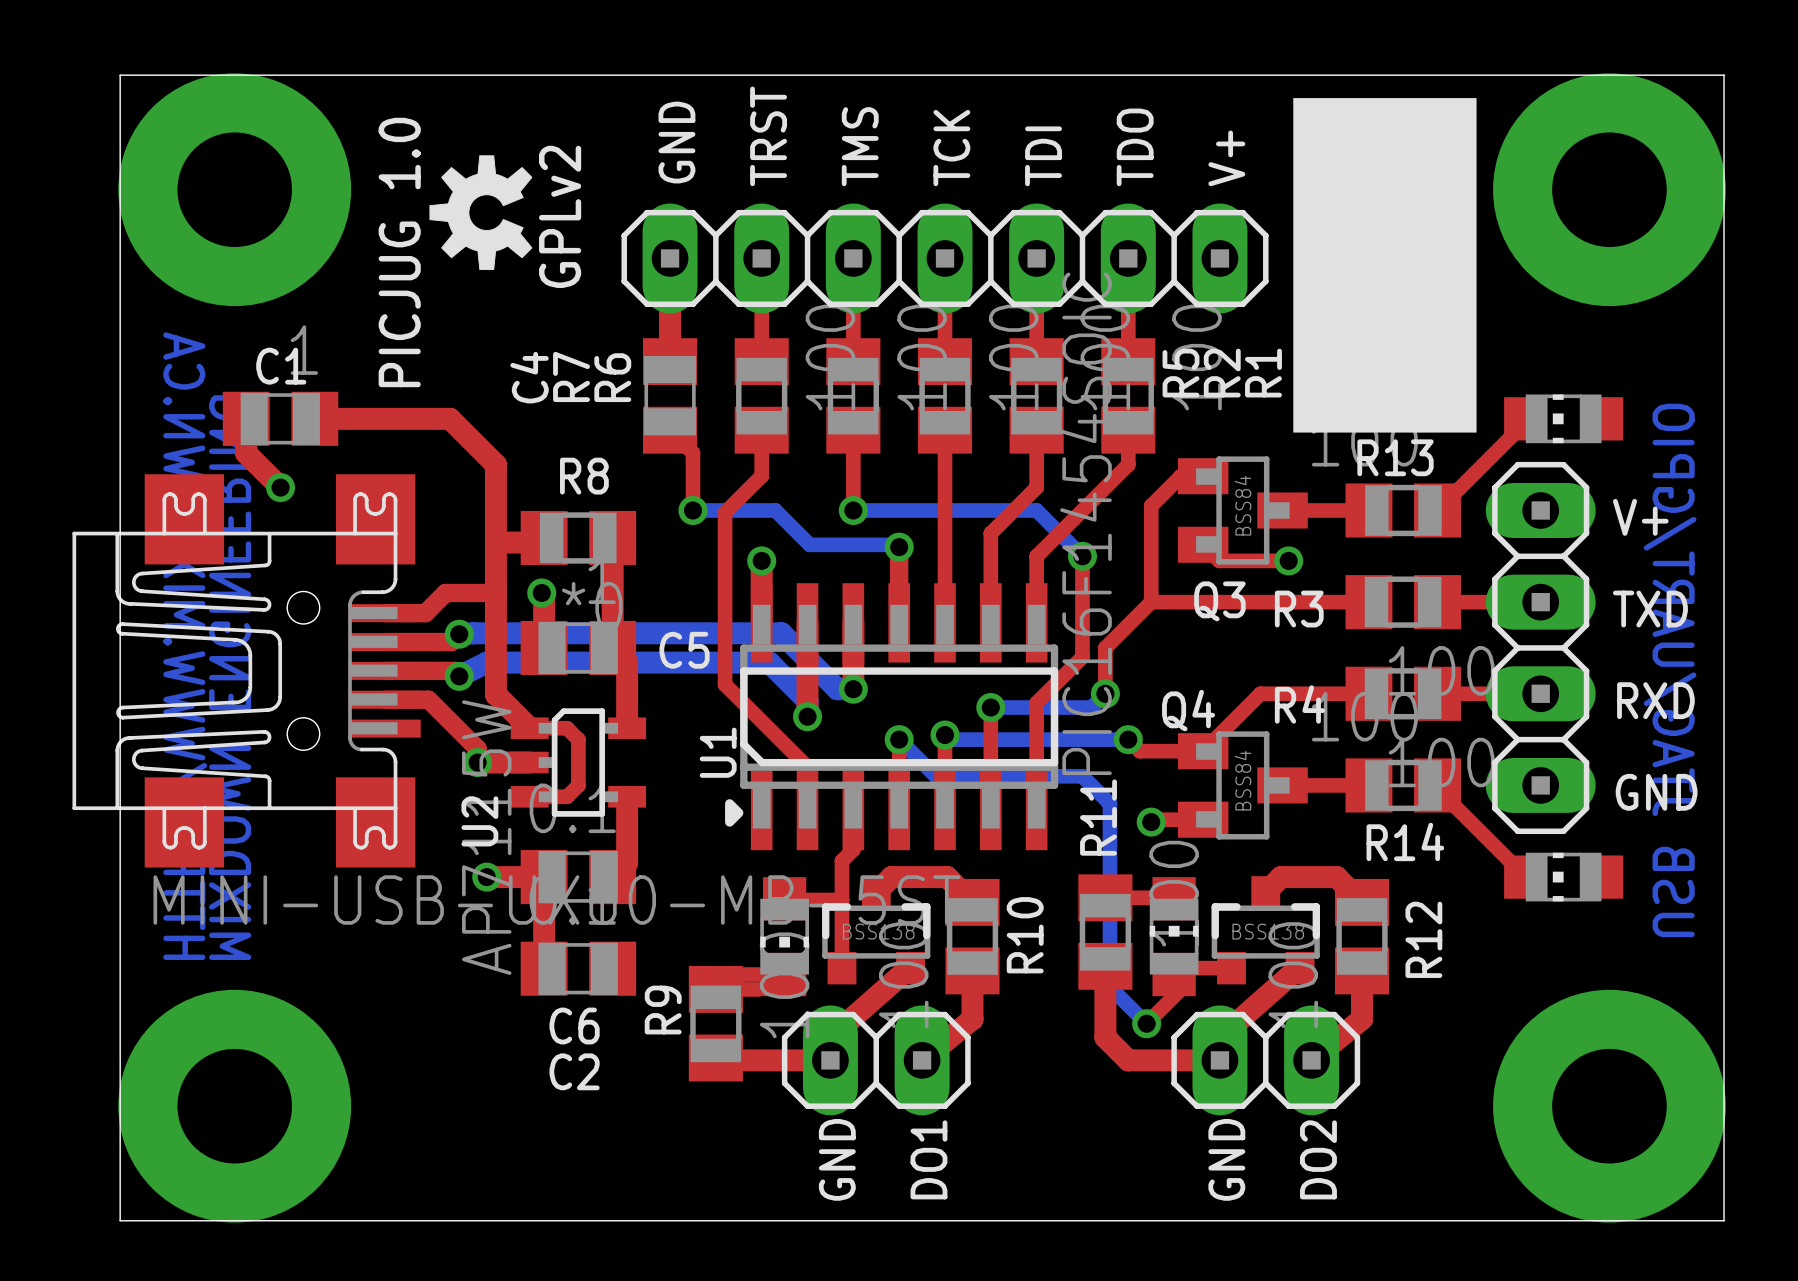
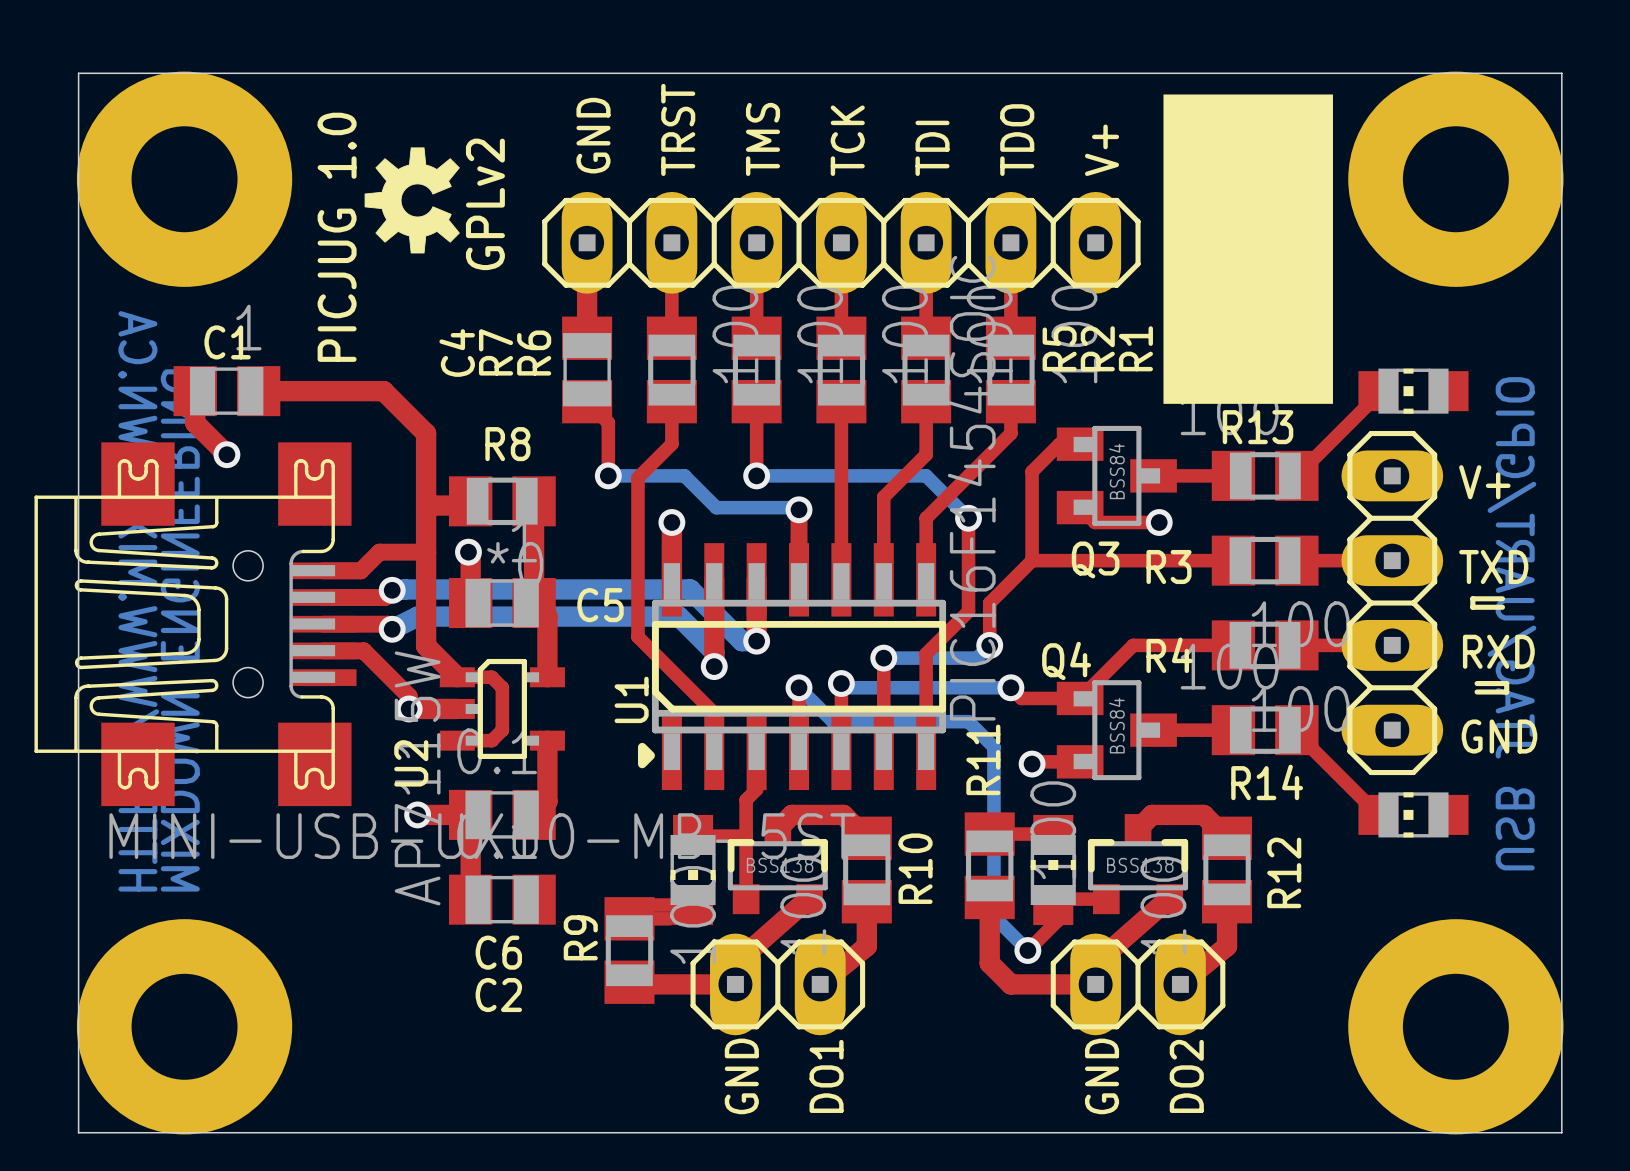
line: none -> (1502, 598) (1472, 598) (1472, 607) (1502, 607)
line: none -> (1477, 683) (1506, 683) (1506, 692) (1477, 692)

